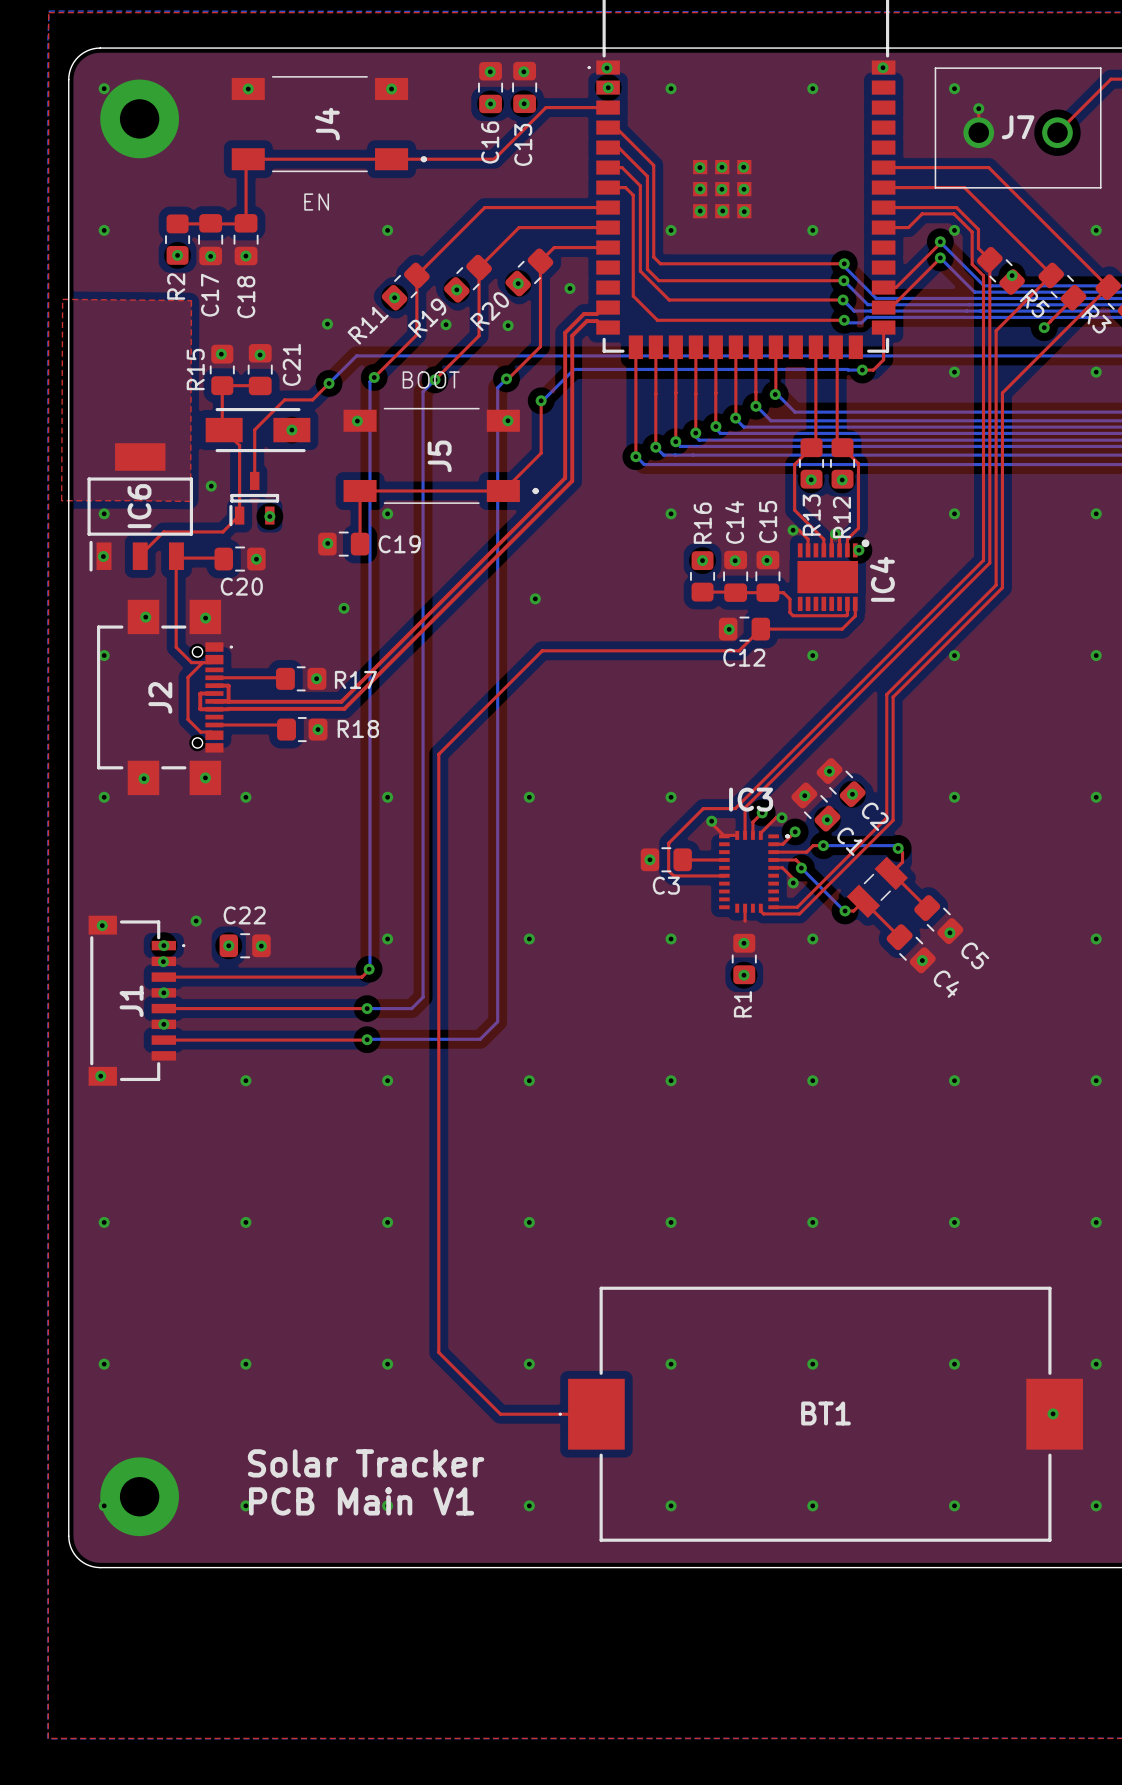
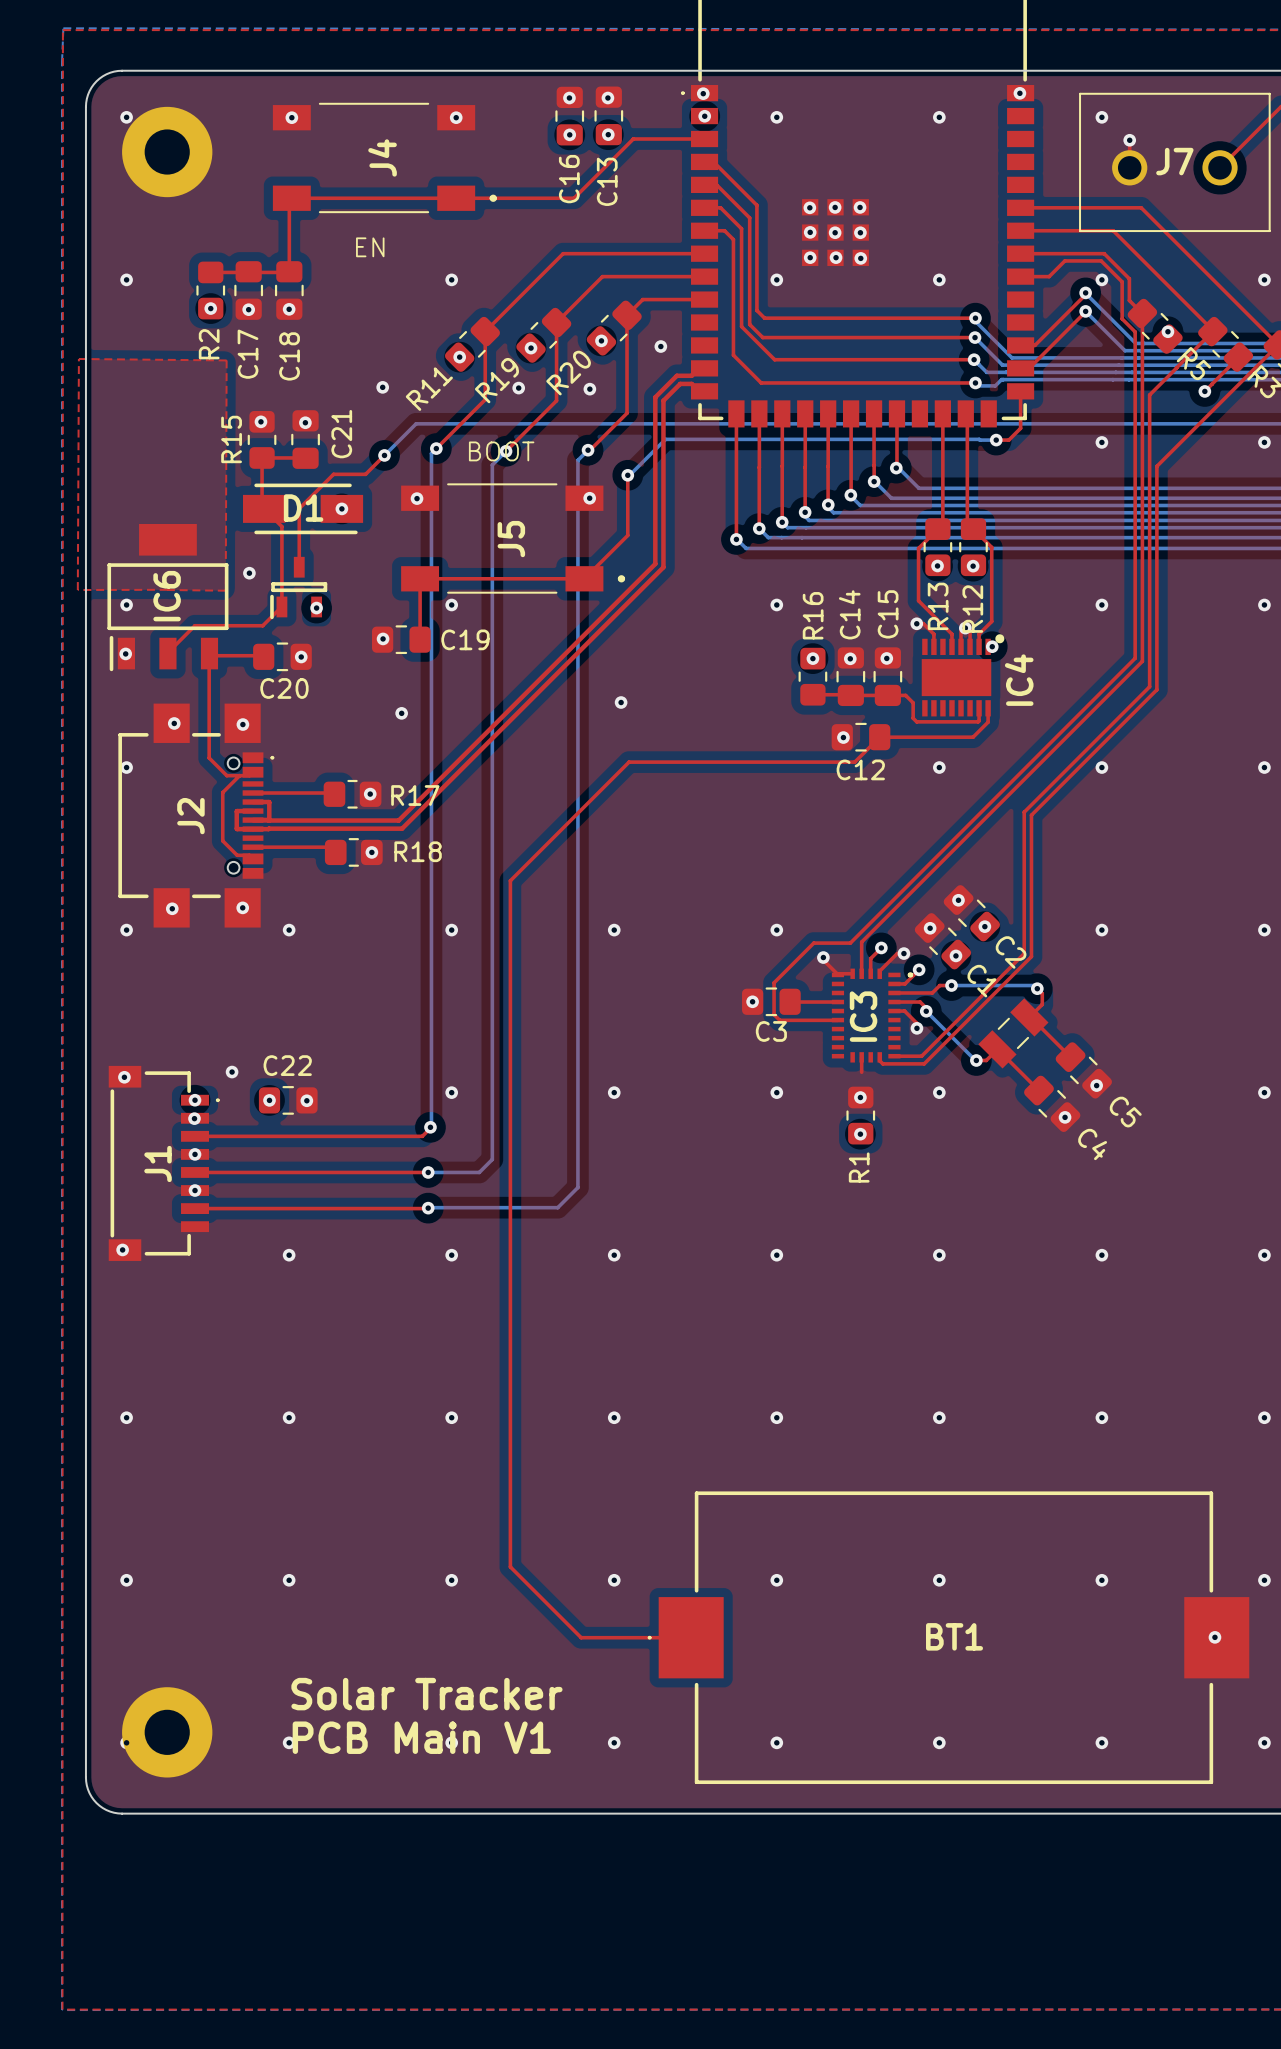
D1 name: none -> D1 (303, 508)
IC3 name rotation: 0° (751, 799) -> 90° counterclockwise (863, 1016)
IC3 name position: IC3 (751, 799) -> IC3 (863, 1016)

